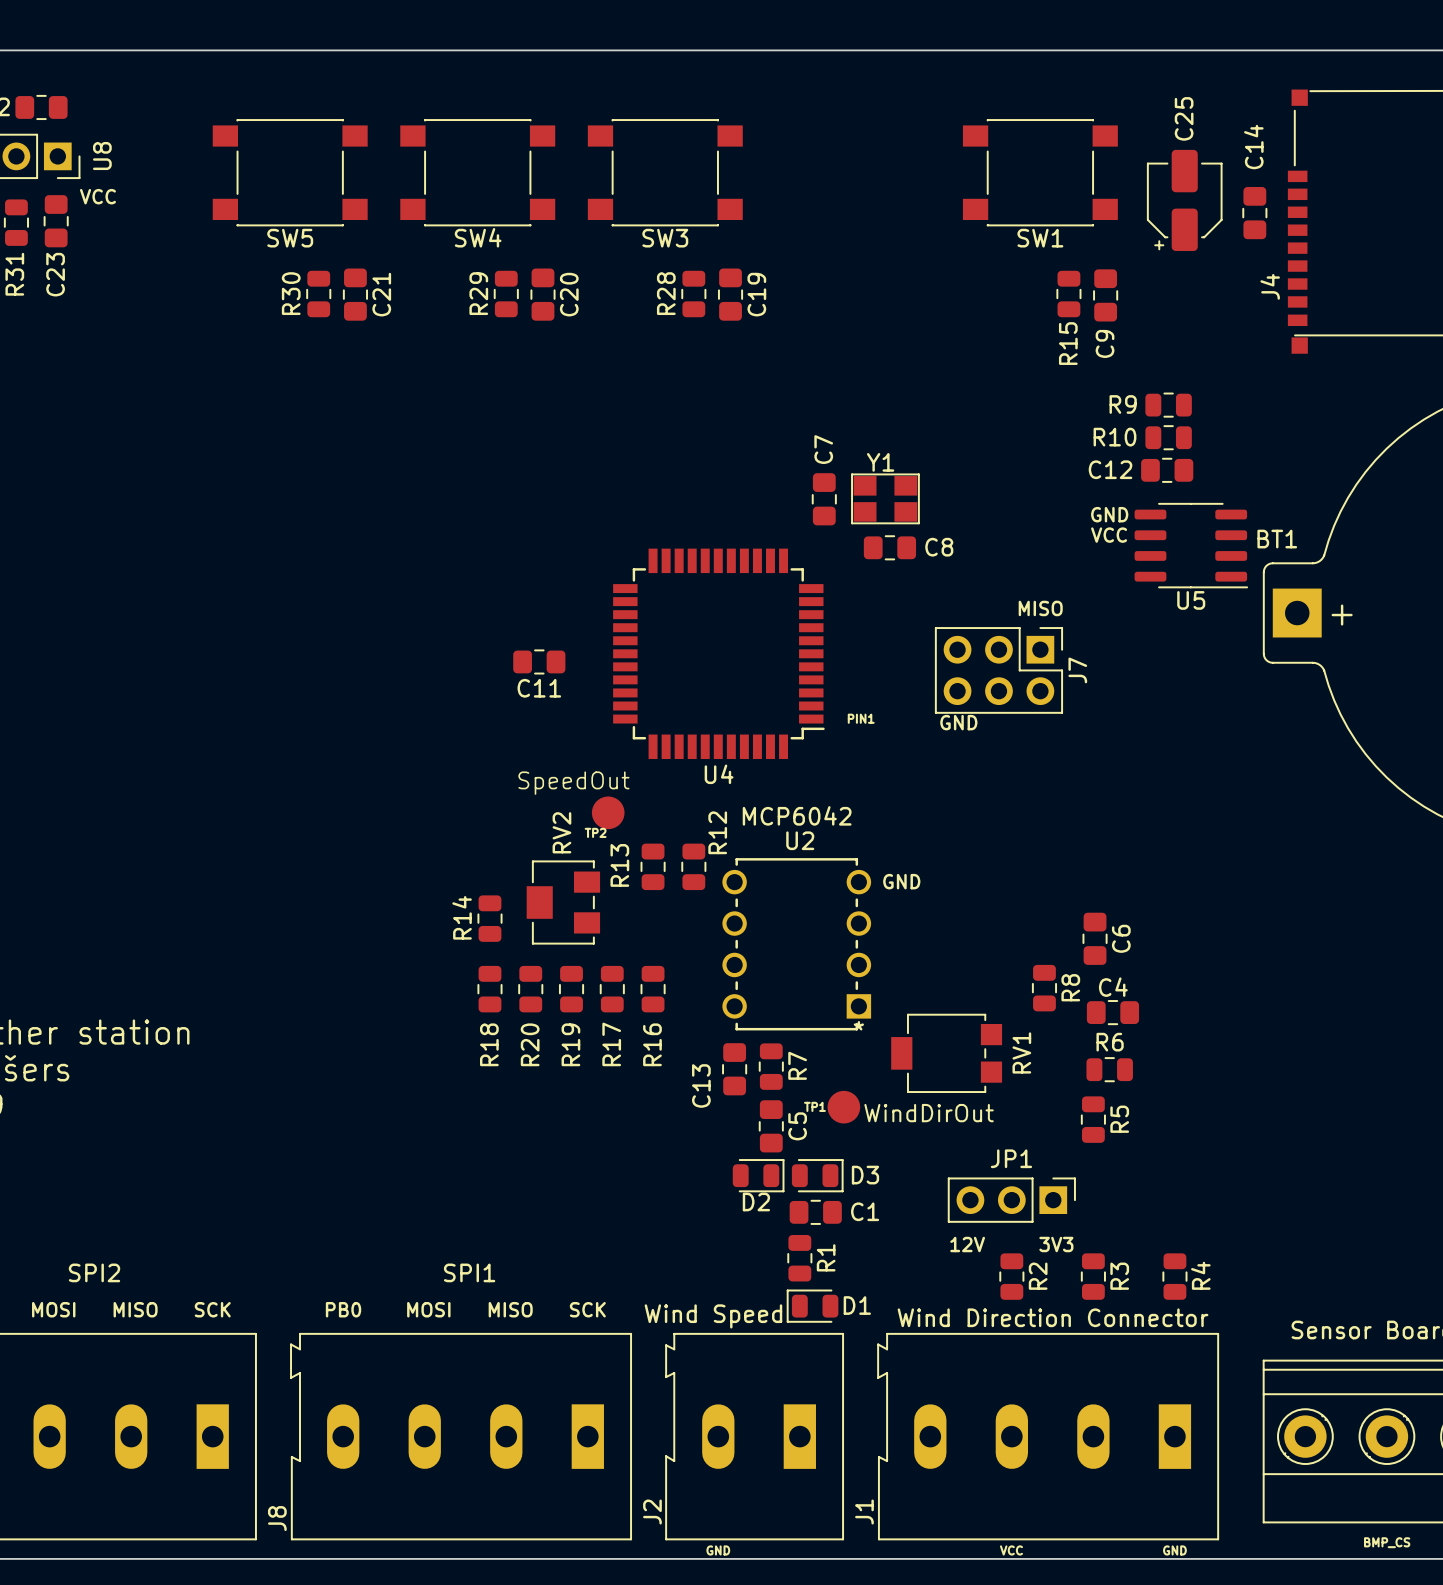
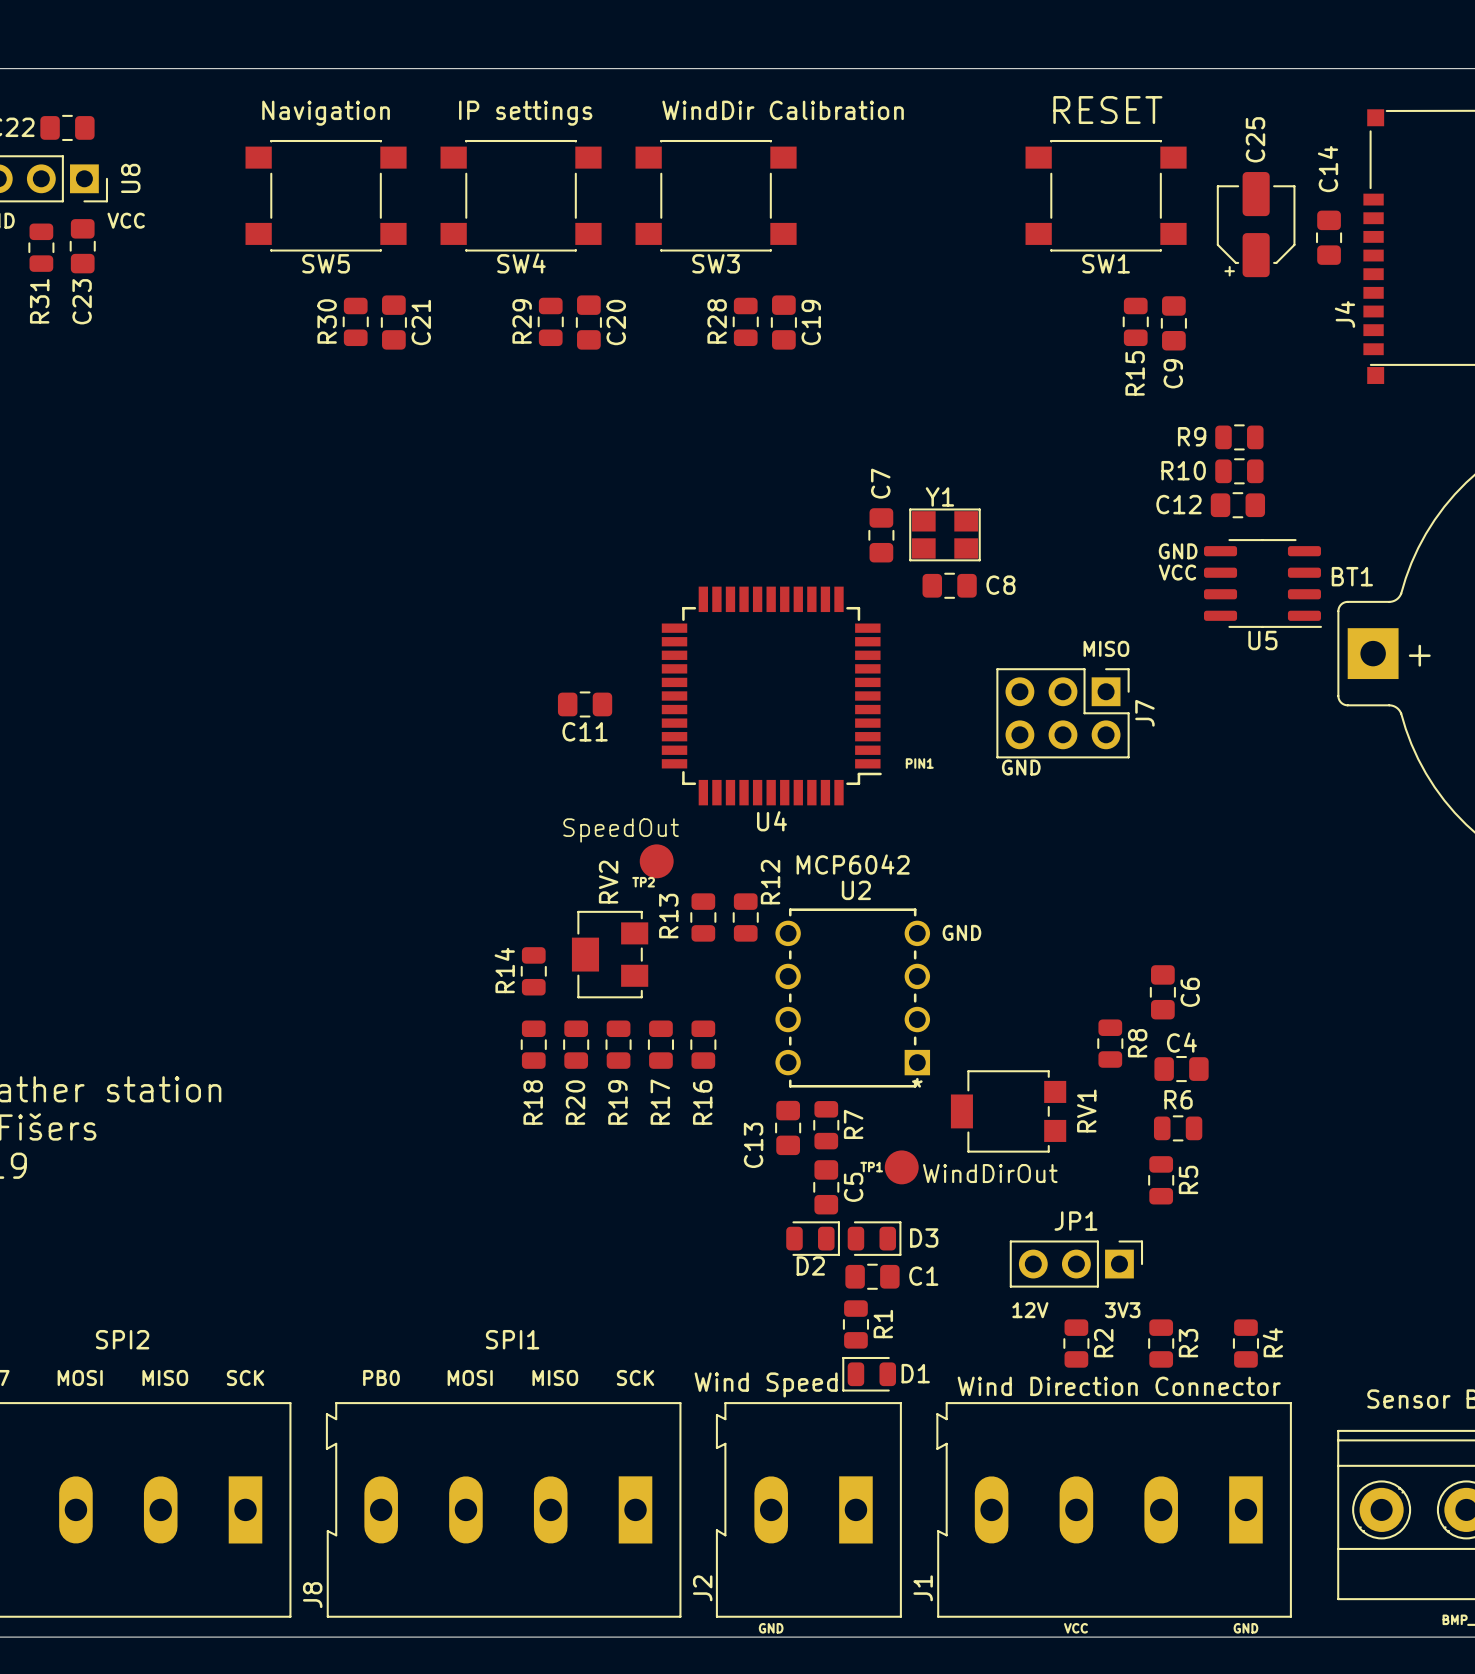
text: none -> WindDir Calibration (783, 110)
text: none -> RESET (1107, 110)
text: none -> Navigation (326, 113)
text: none -> IP settings (525, 113)

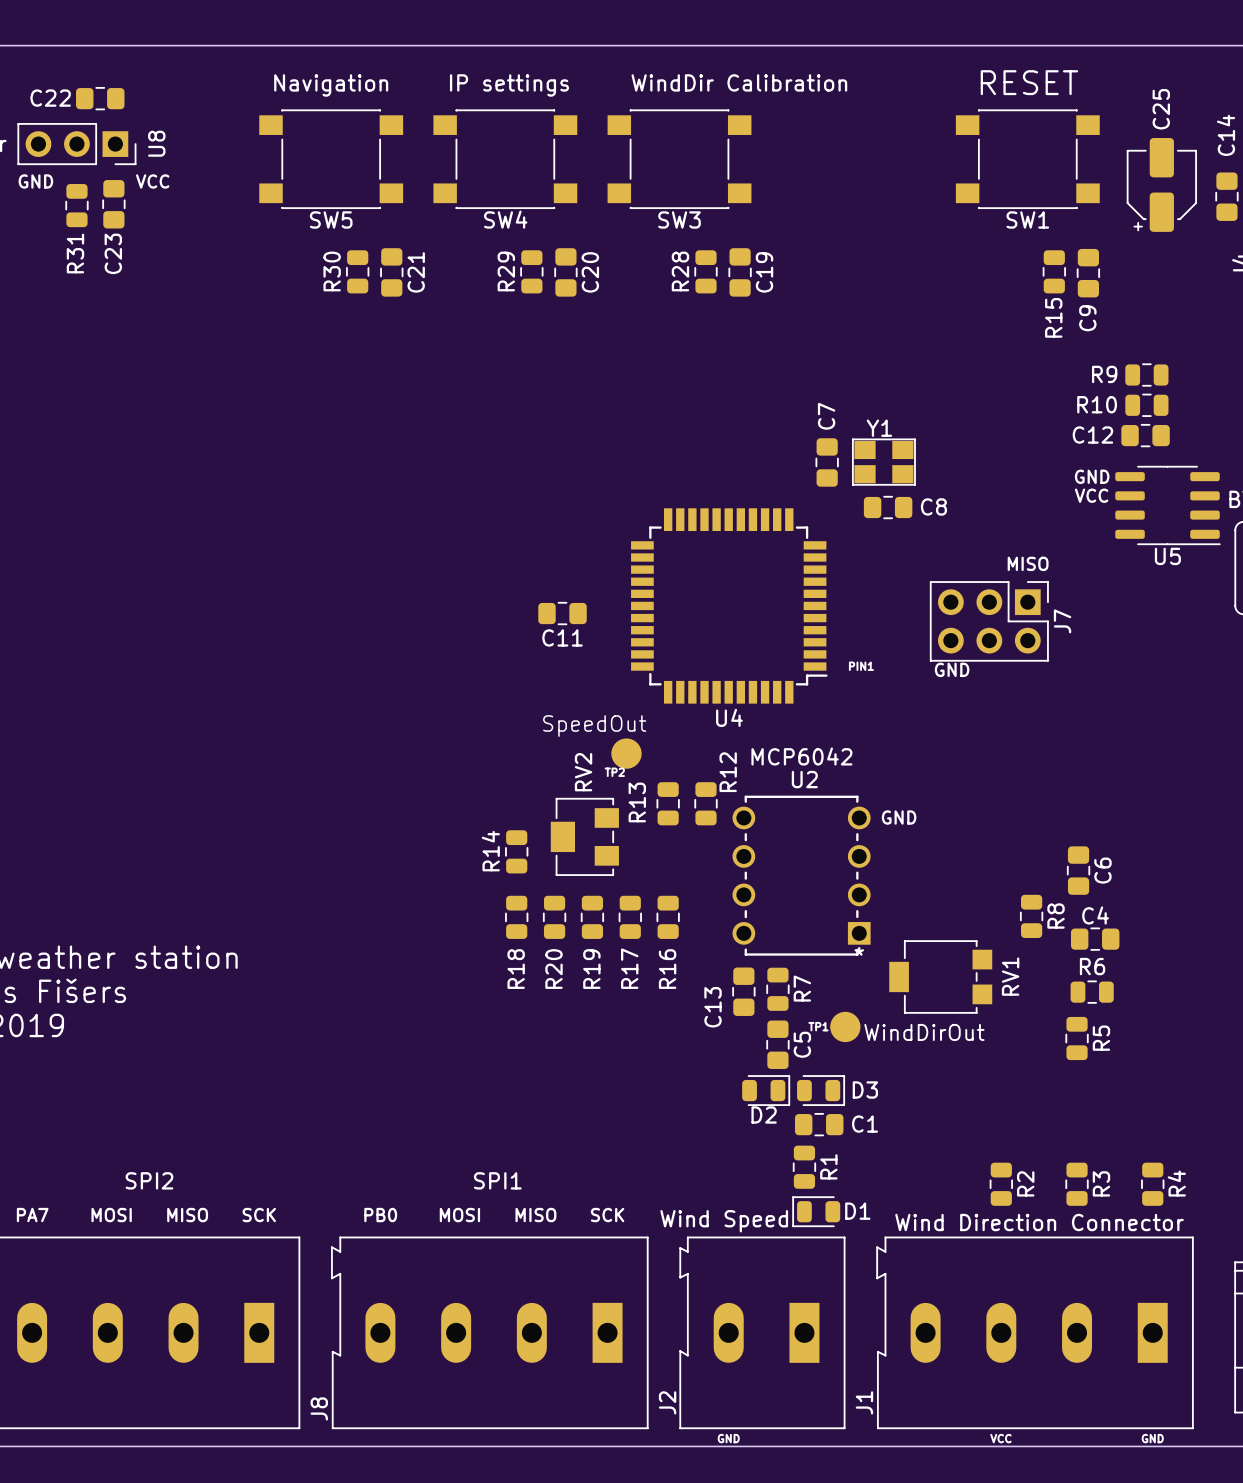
JP1: (1076, 1264) -> none
text: 12V (1030, 1310) -> none
text: 3V3 (1122, 1310) -> none

